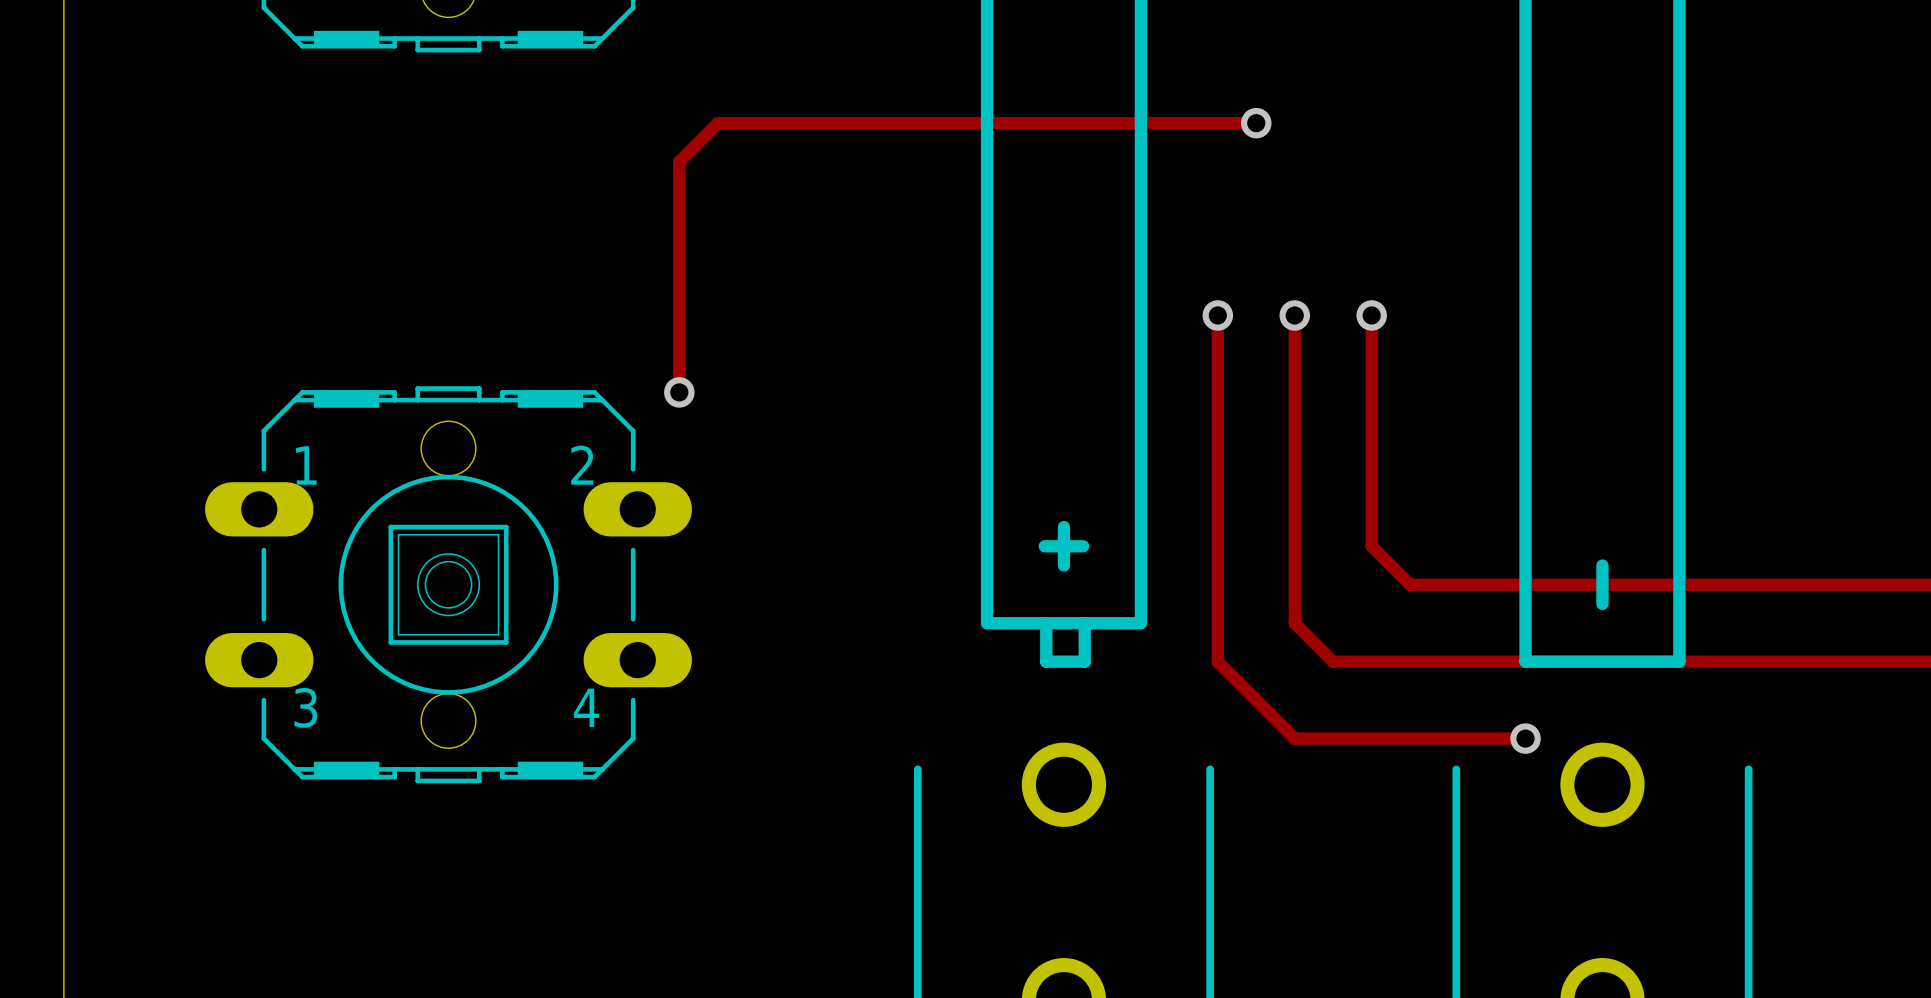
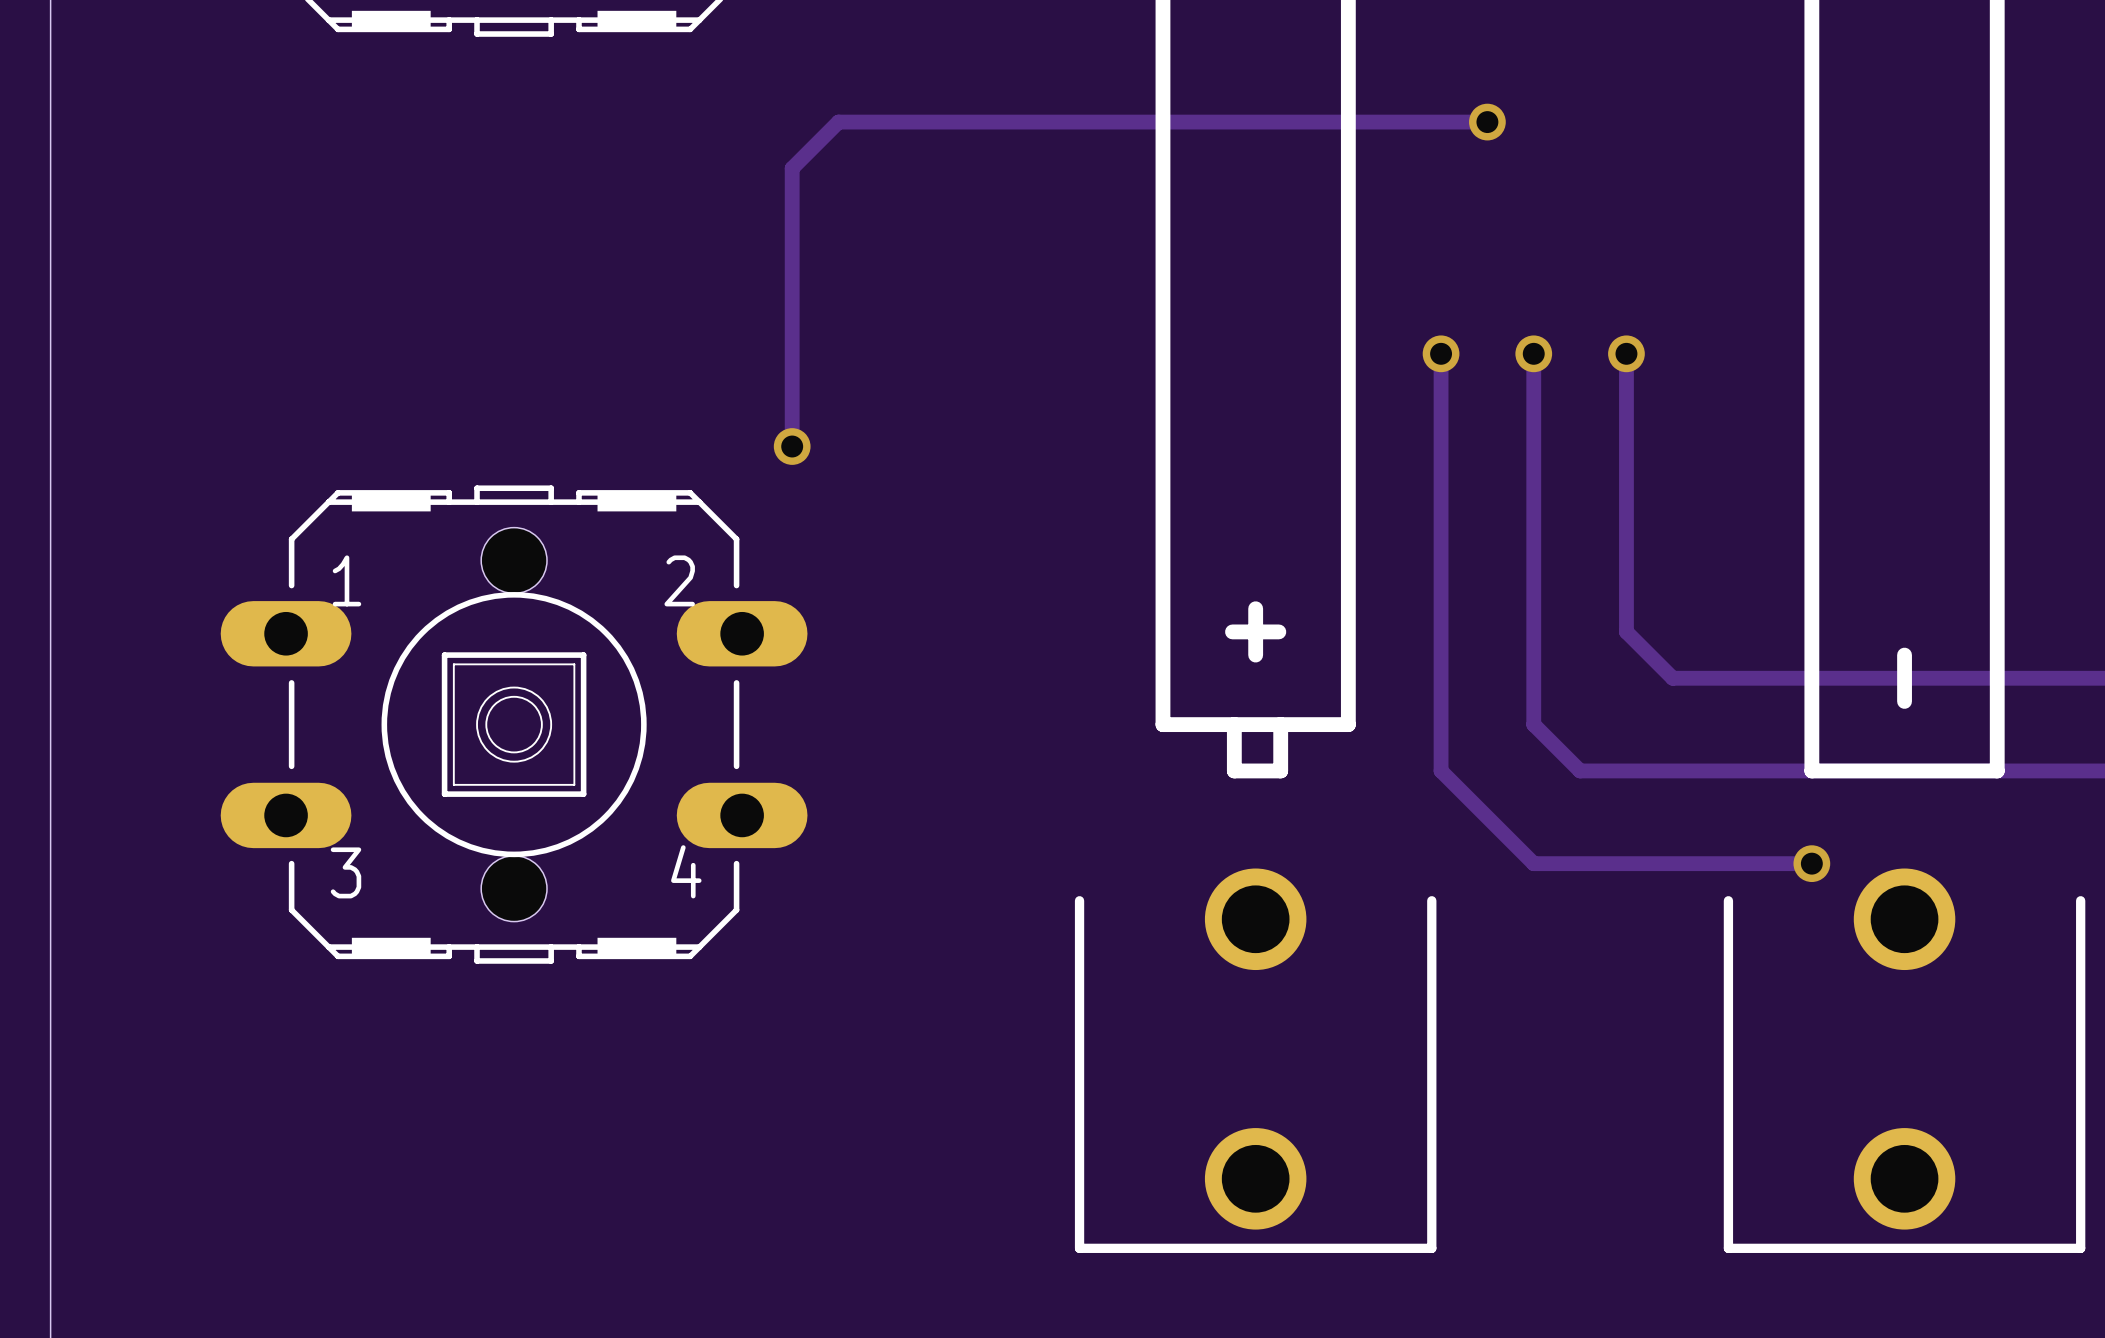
part position: (448, 584) -> (514, 724)

